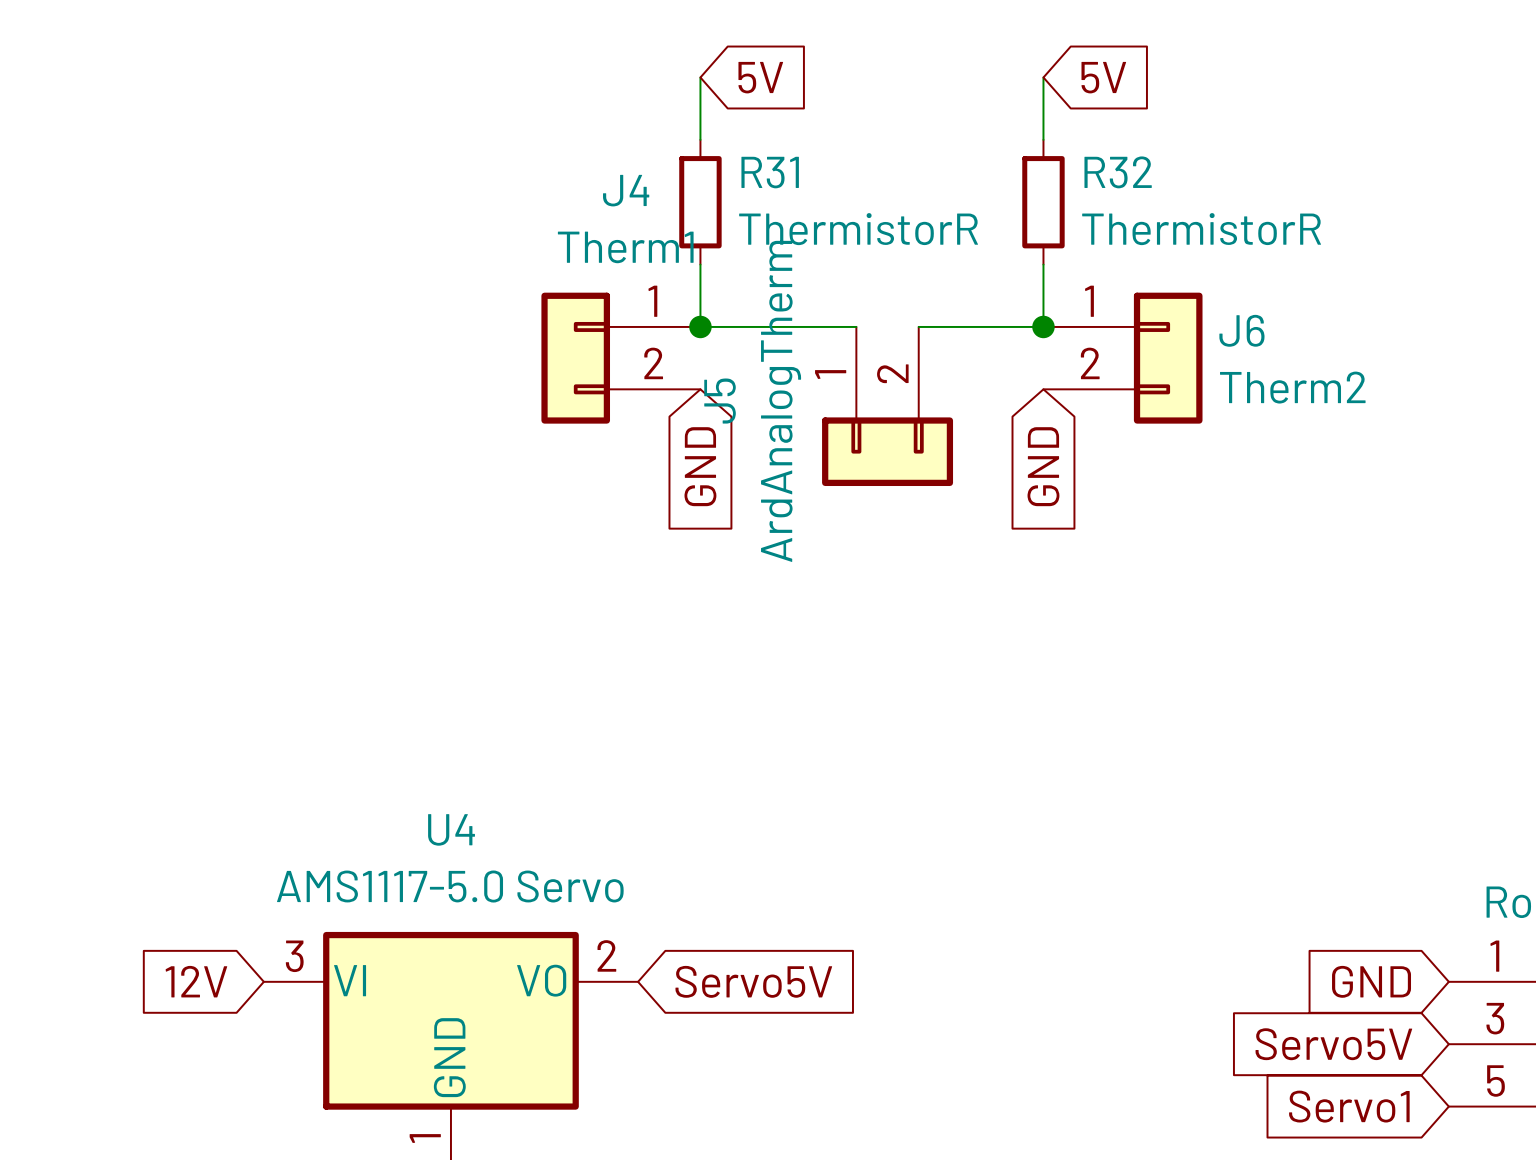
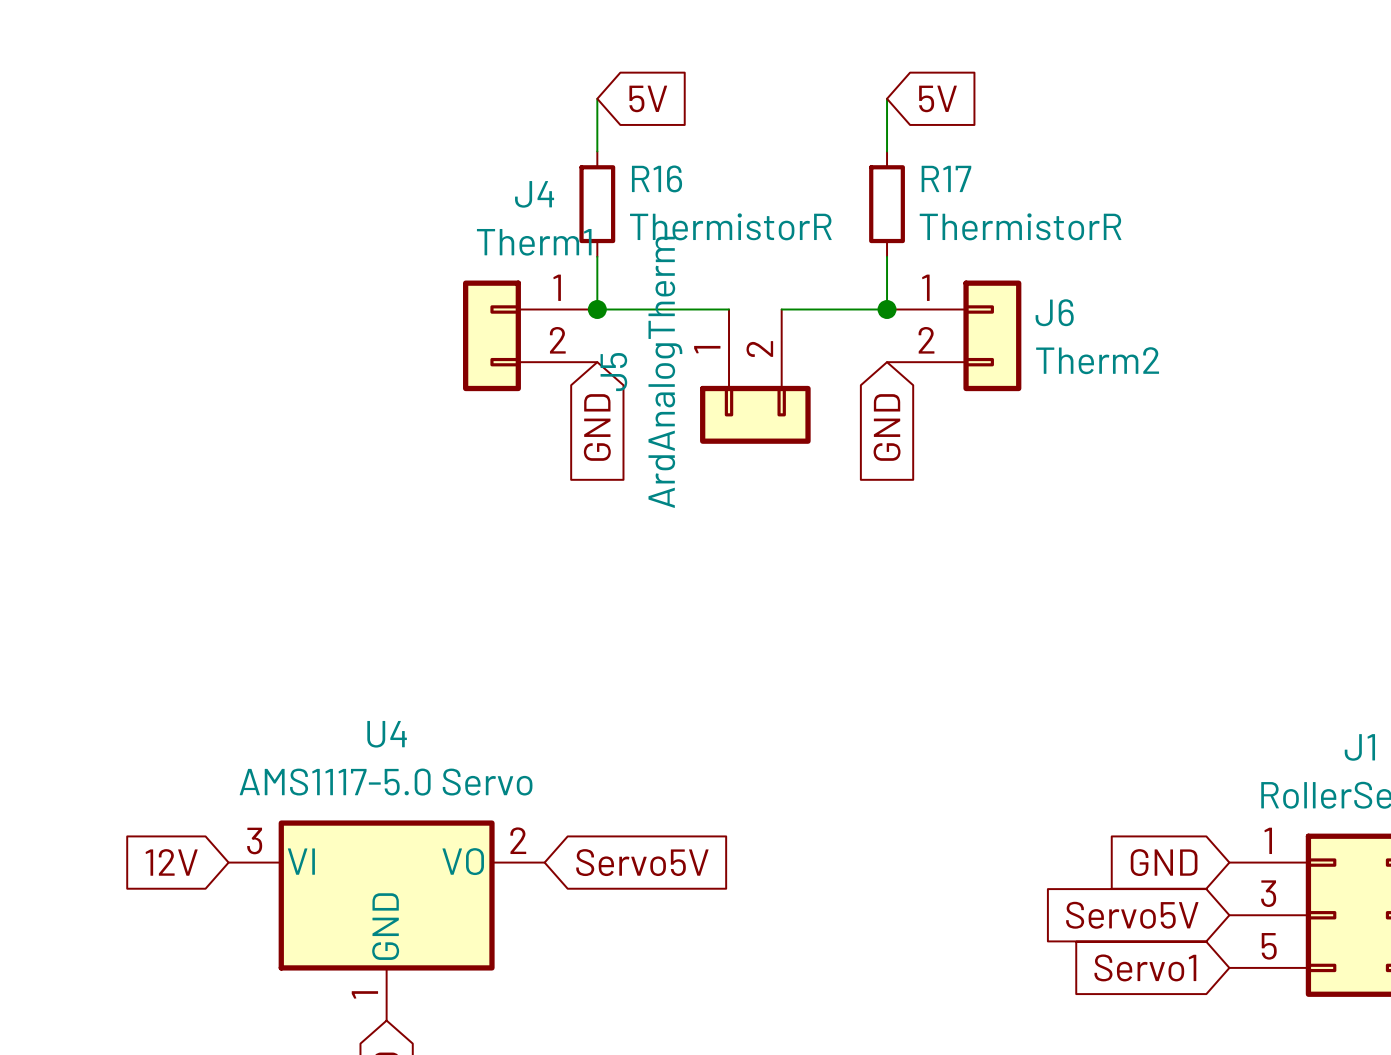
R31 name: R31 (770, 172) -> R16 (657, 178)
R32 name: R32 (1118, 172) -> R17 (946, 178)

